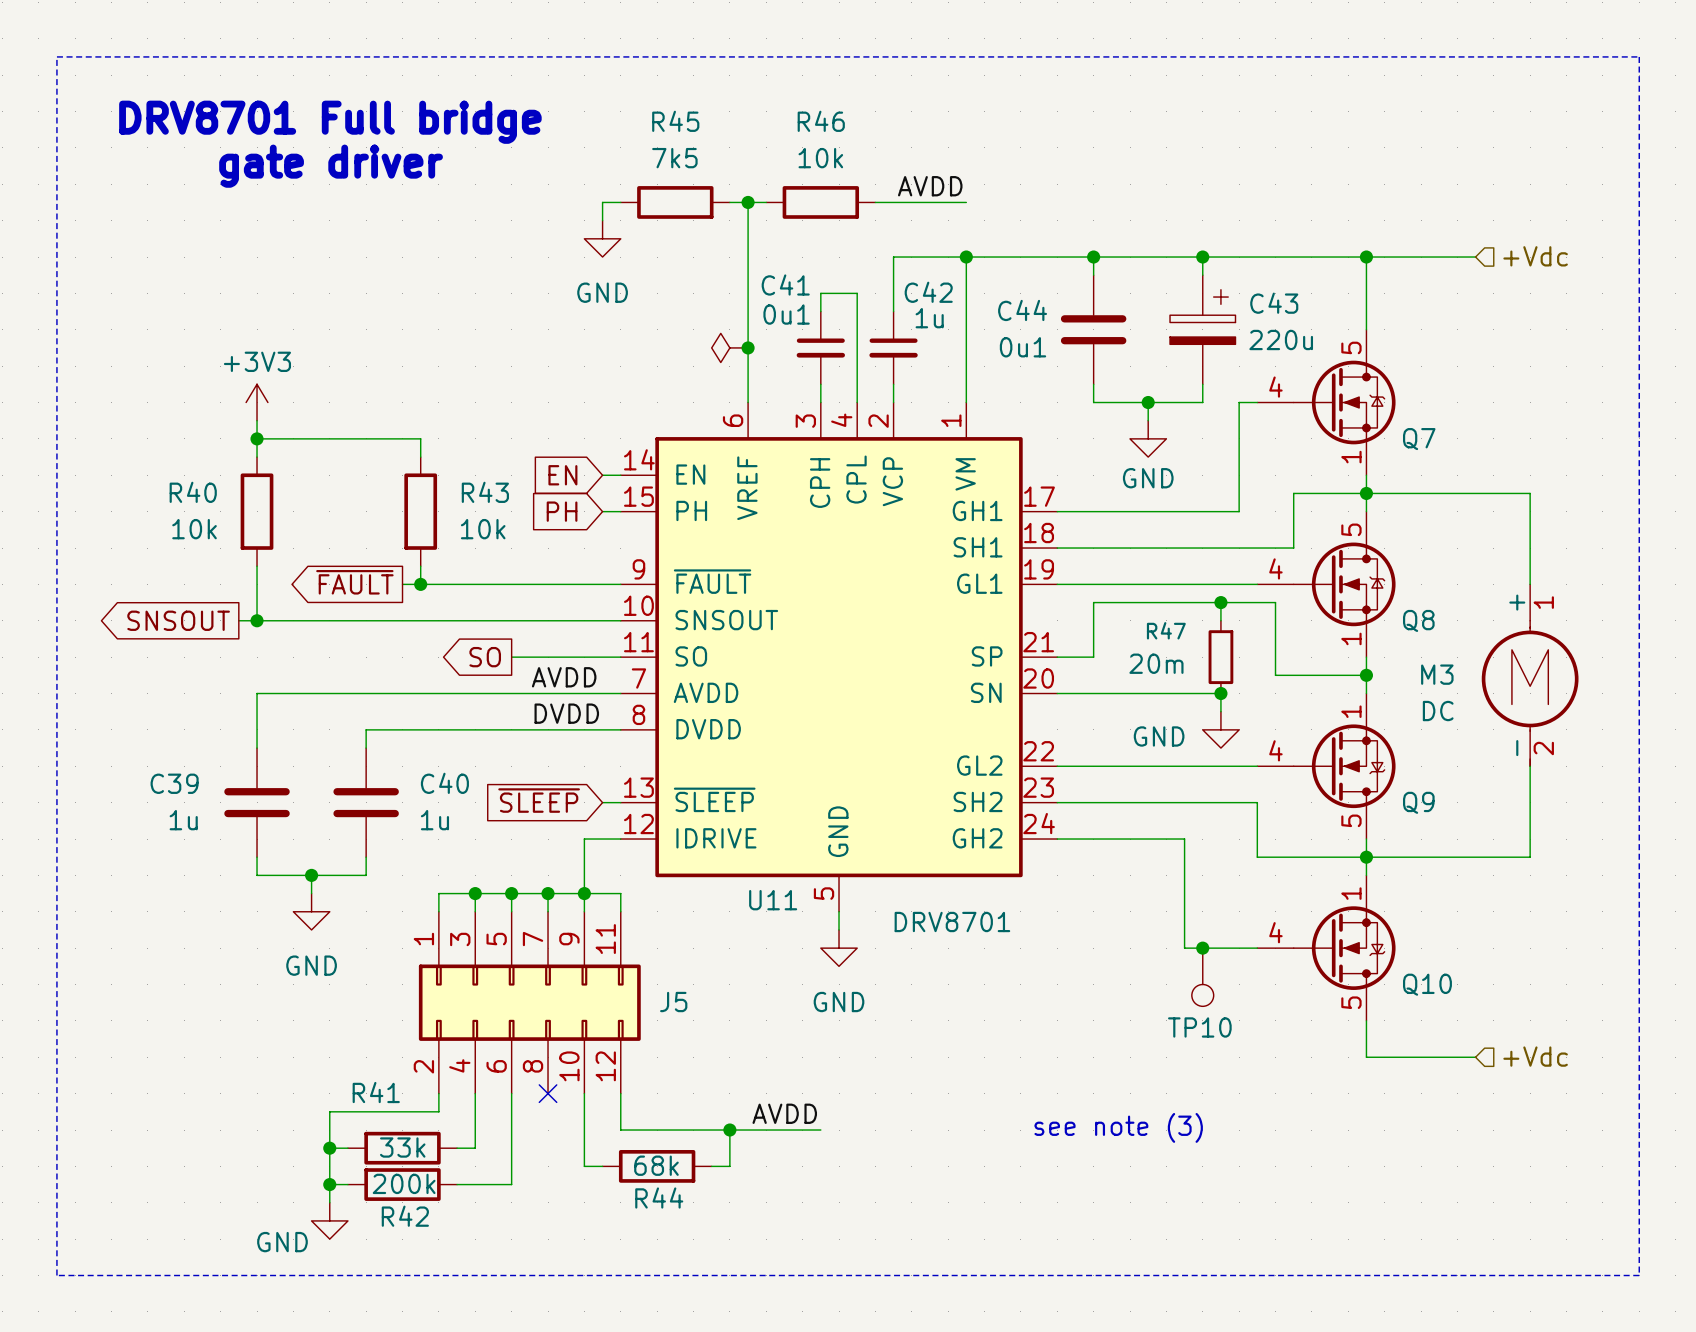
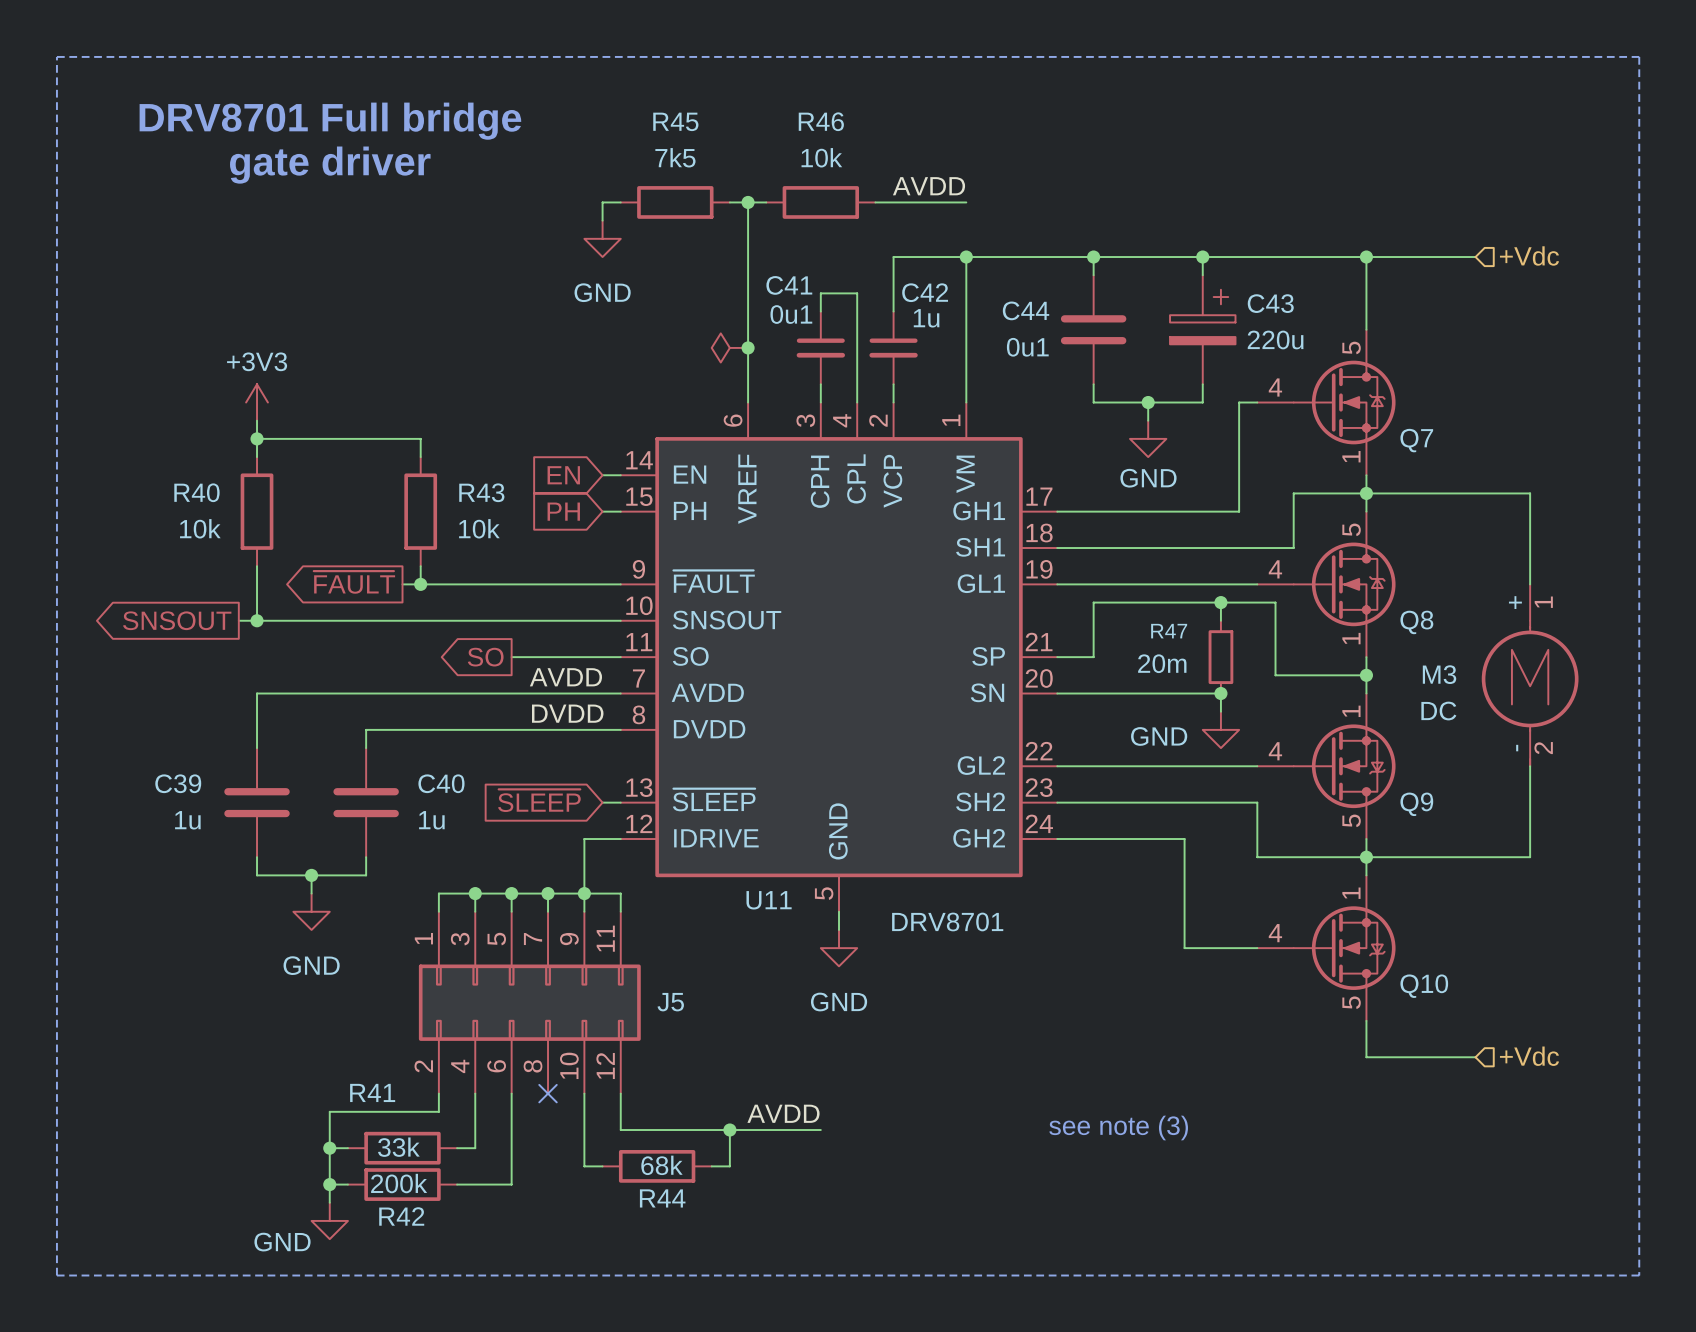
junction: (1202, 948) -> none
TP10: (1202, 977) -> none

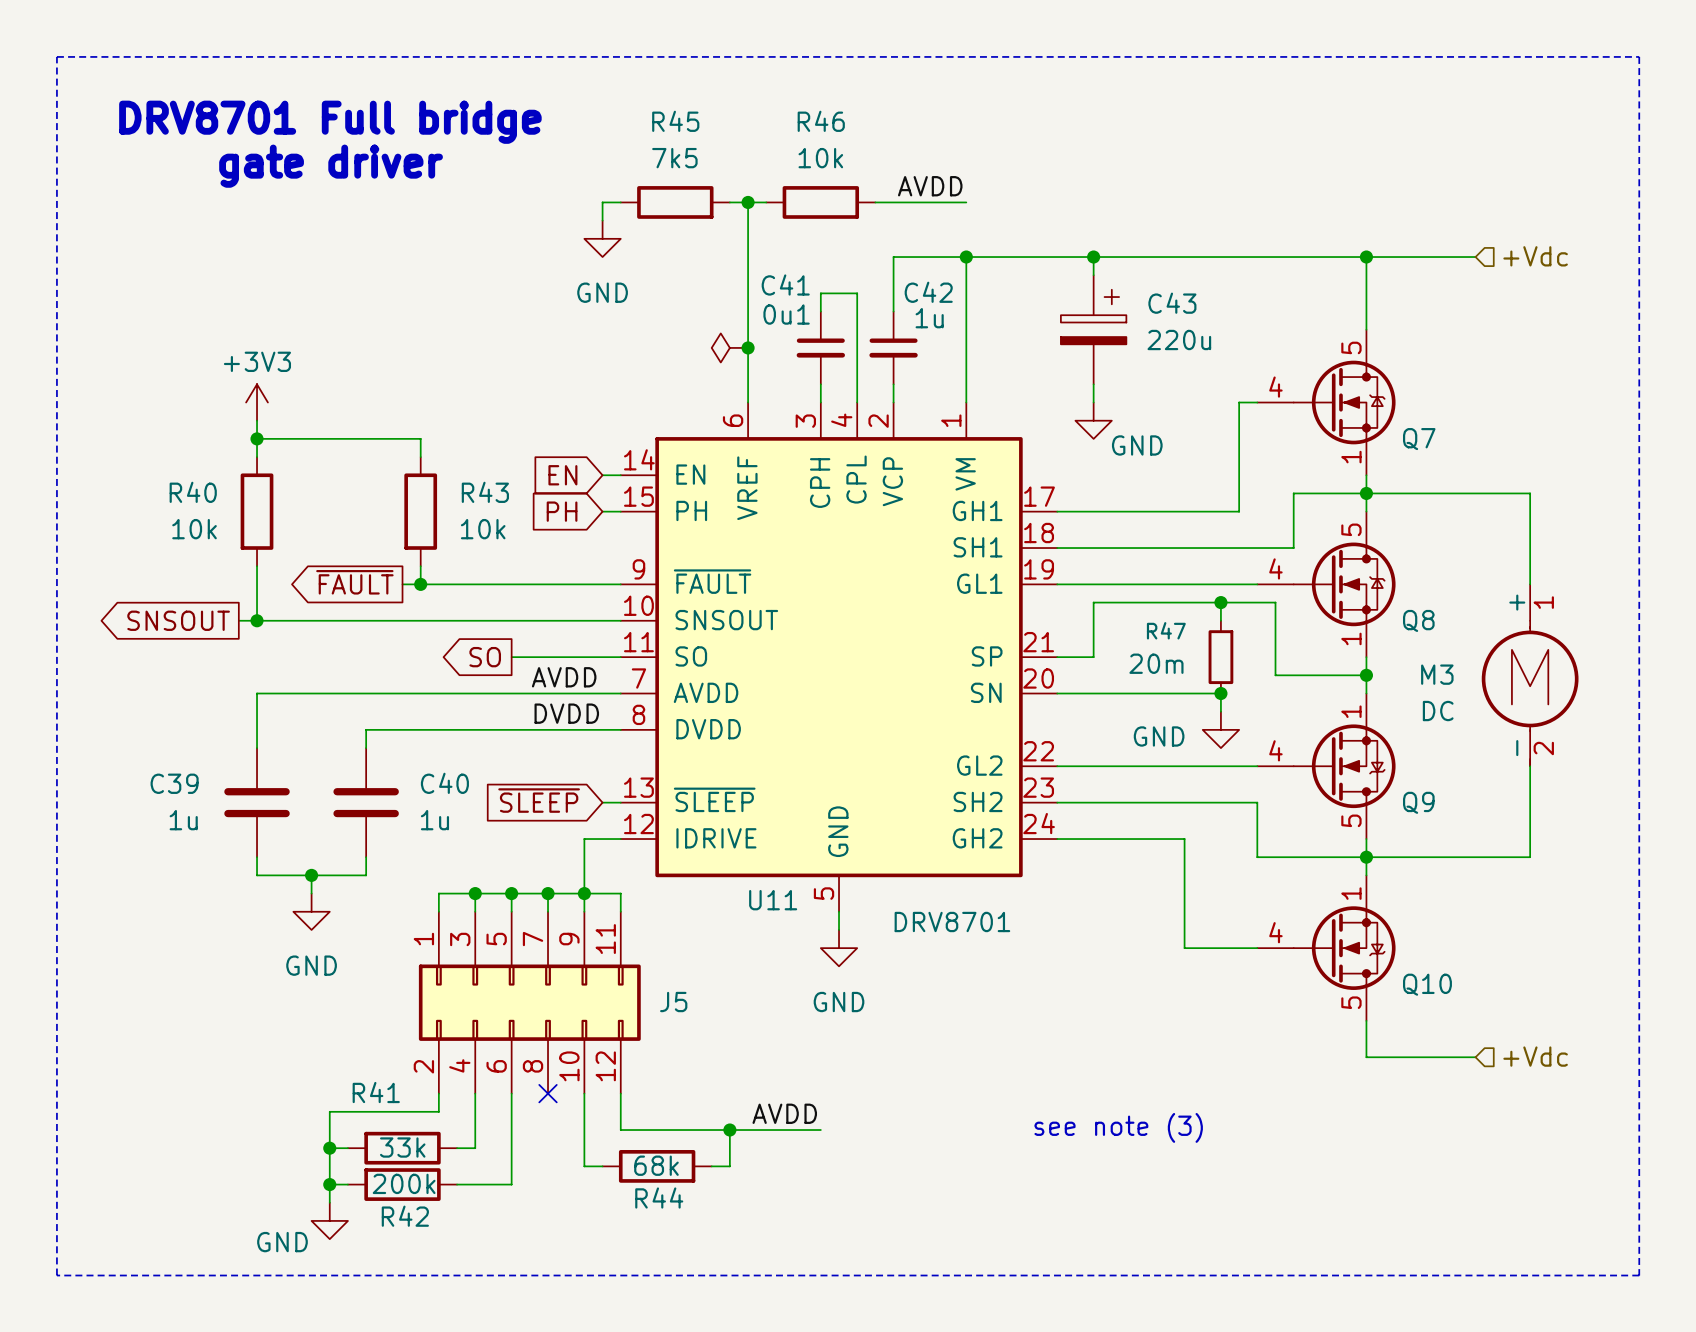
wire: (1202, 257) (1202, 275) -> none
junction: (1202, 257) -> none
C43 name position: C43 (1270, 303) -> C43 (1172, 303)
C44: 0u1 (1093, 329) -> none
C43 position: (1202, 329) -> (1093, 329)
C43 value position: 220u (1275, 339) -> 220u (1179, 339)
wire: (1202, 384) (1202, 402) (1093, 402) -> none
wire: (1148, 402) (1148, 420) -> none
junction: (1148, 402) -> none
power symbol position: GND (1148, 438) -> GND (1093, 420)
power symbol text position: GND (1148, 478) -> GND (1137, 445)

